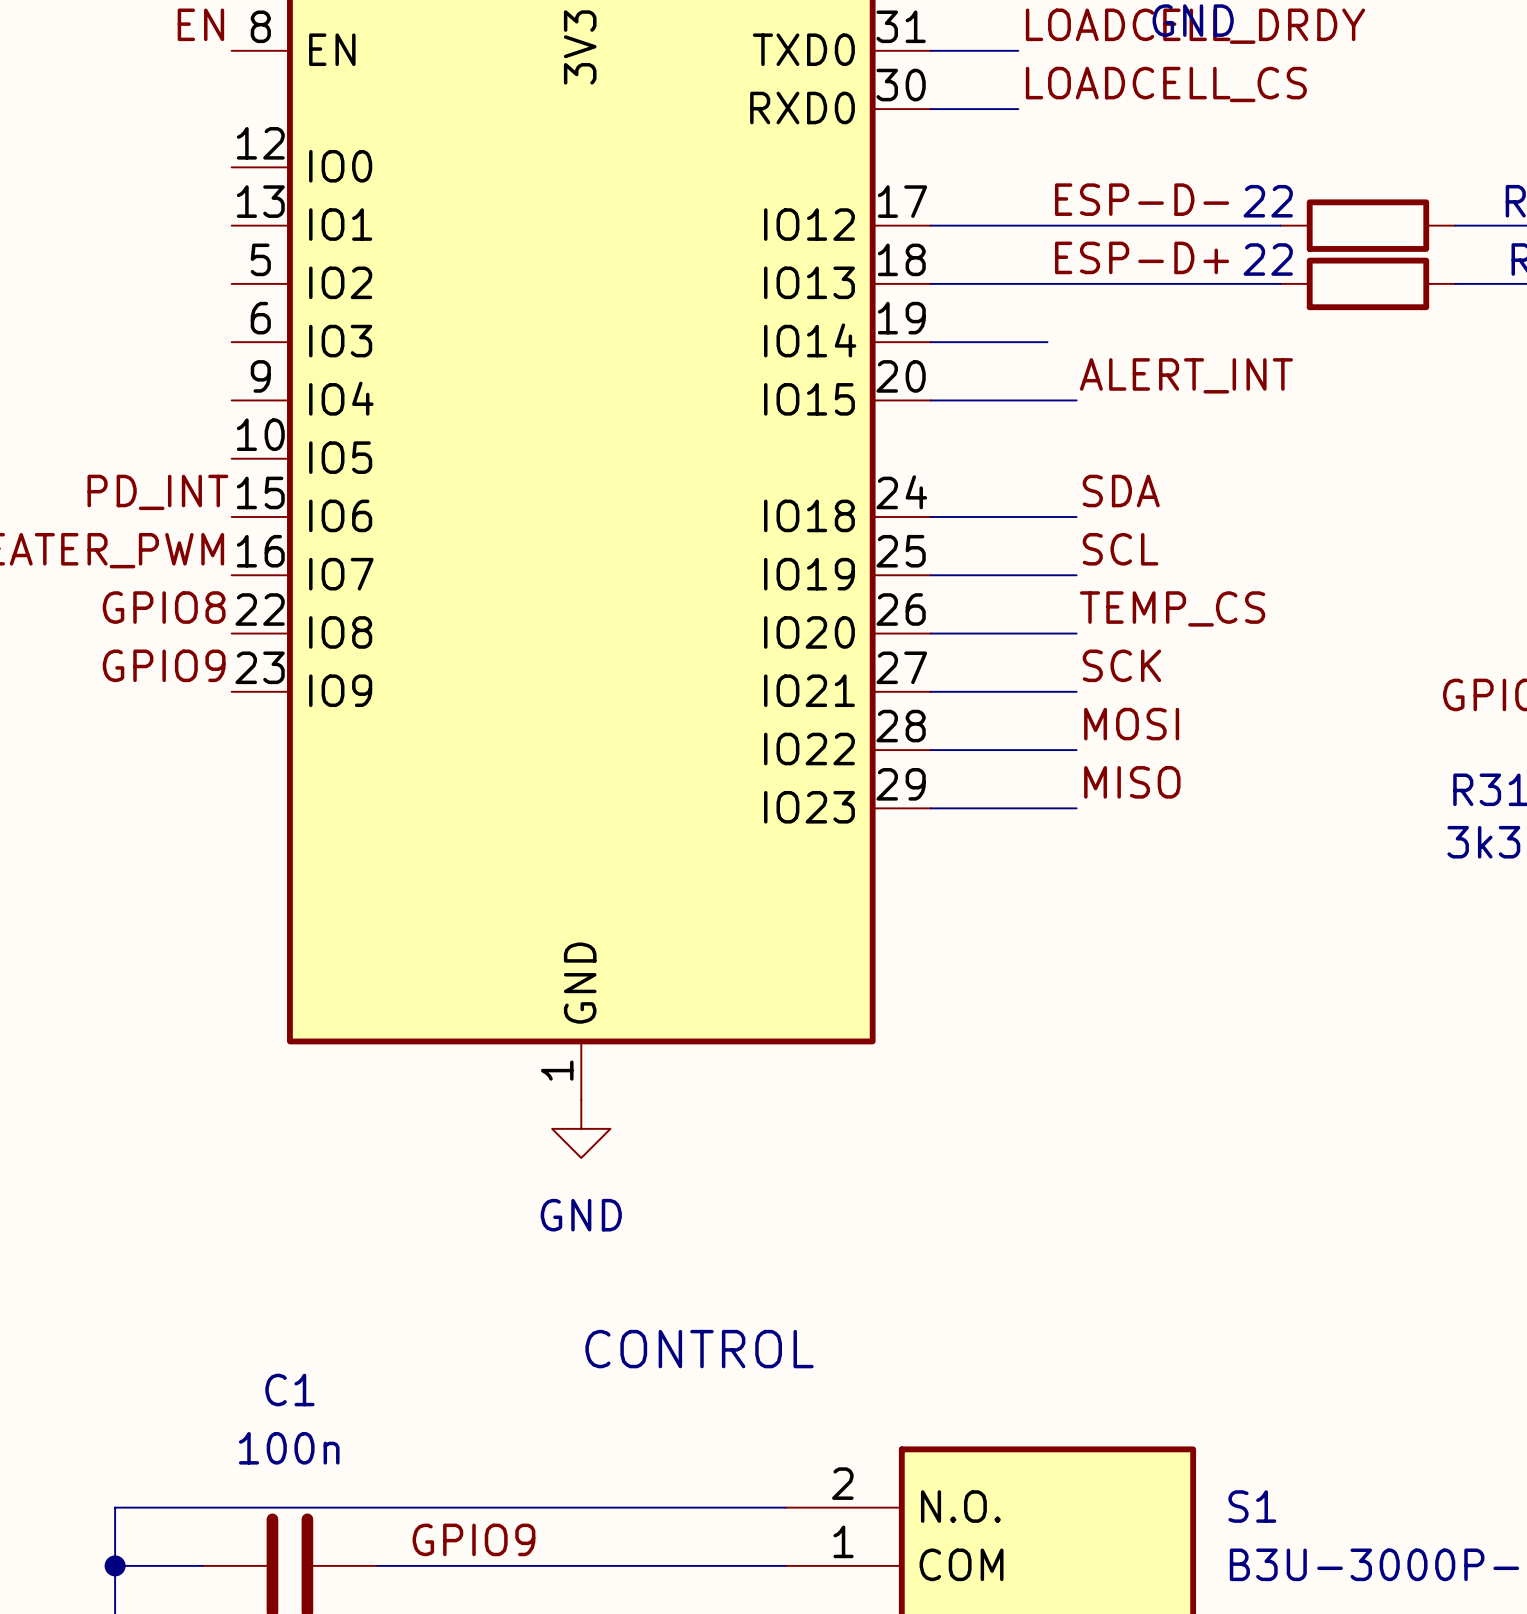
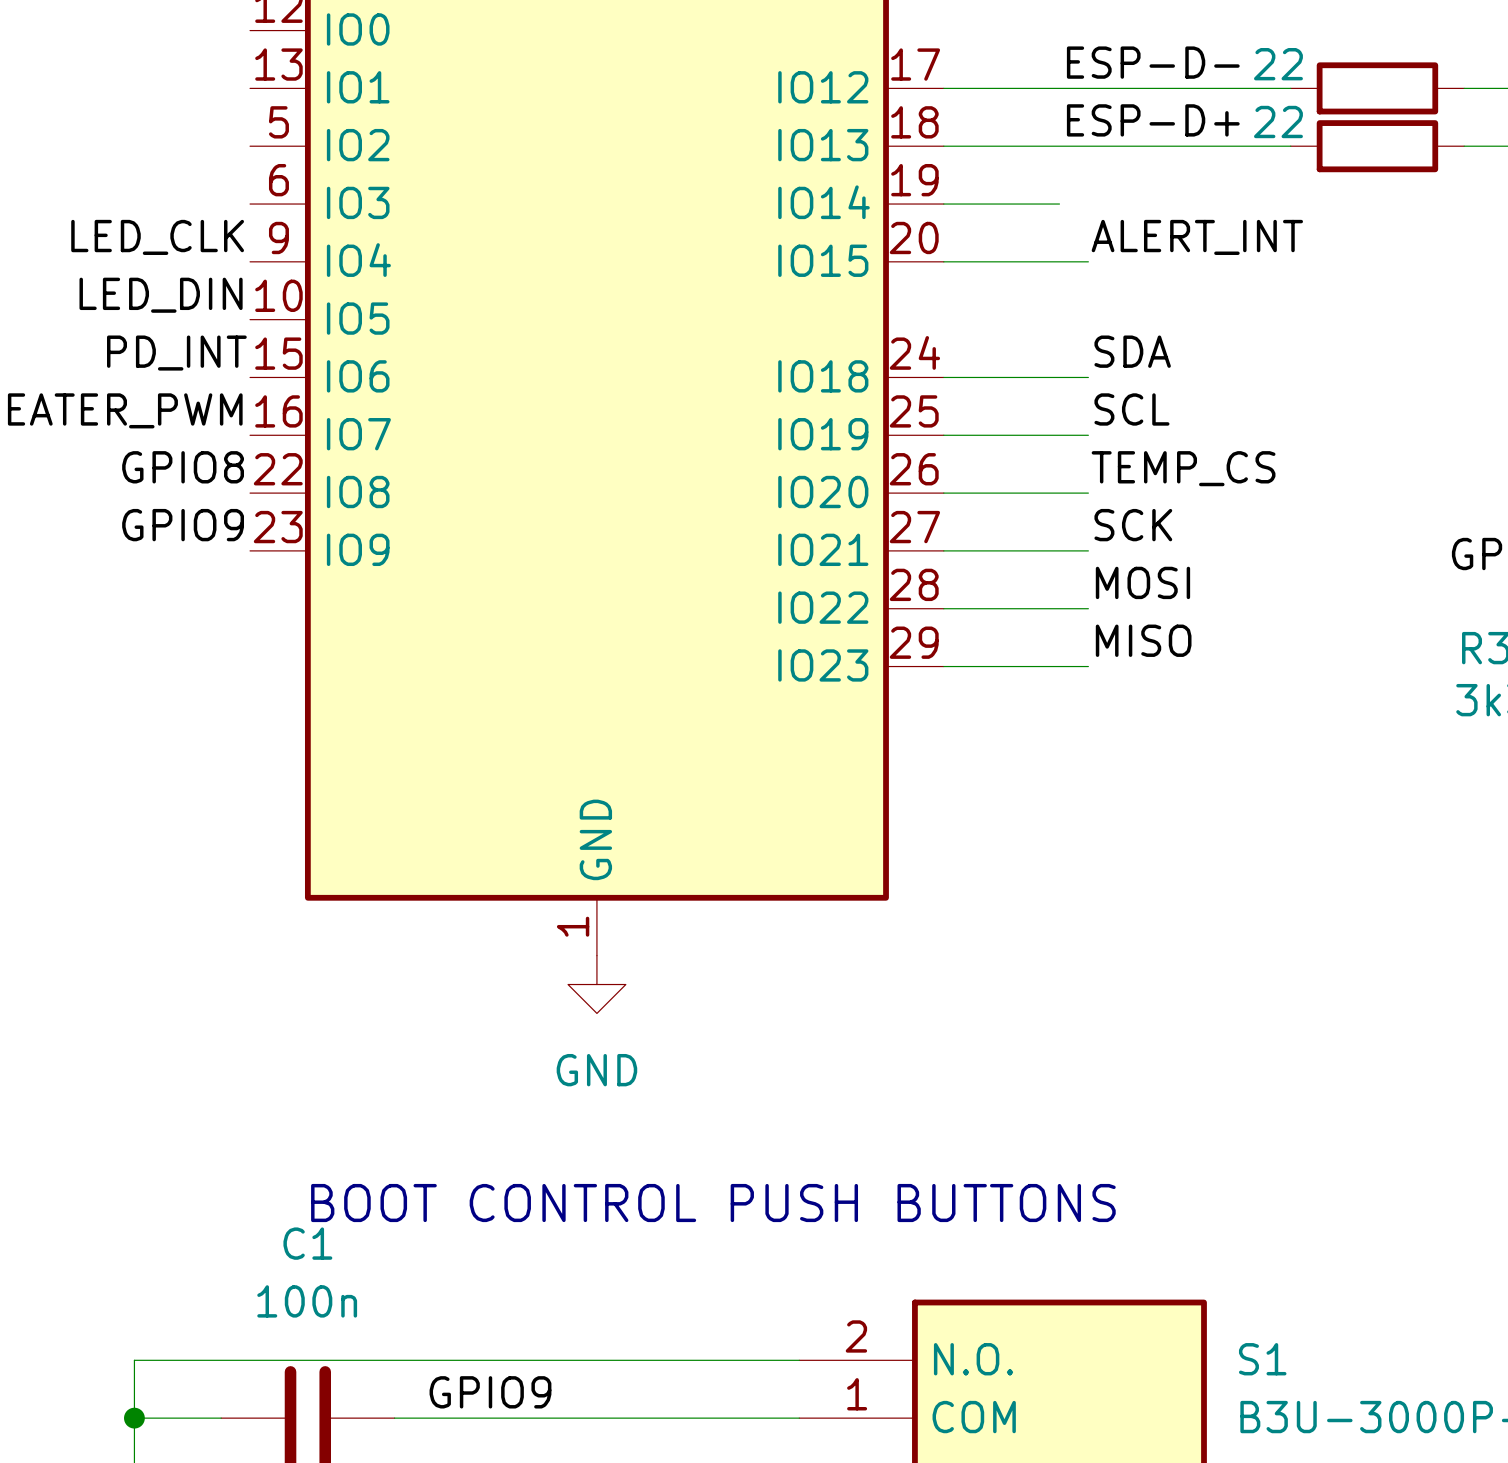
label: none -> LED_CLK (157, 237)
label: none -> LED_DIN (161, 295)
text: CONTROL (699, 1349) -> BOOT CONTROL PUSH BUTTONS (713, 1203)

